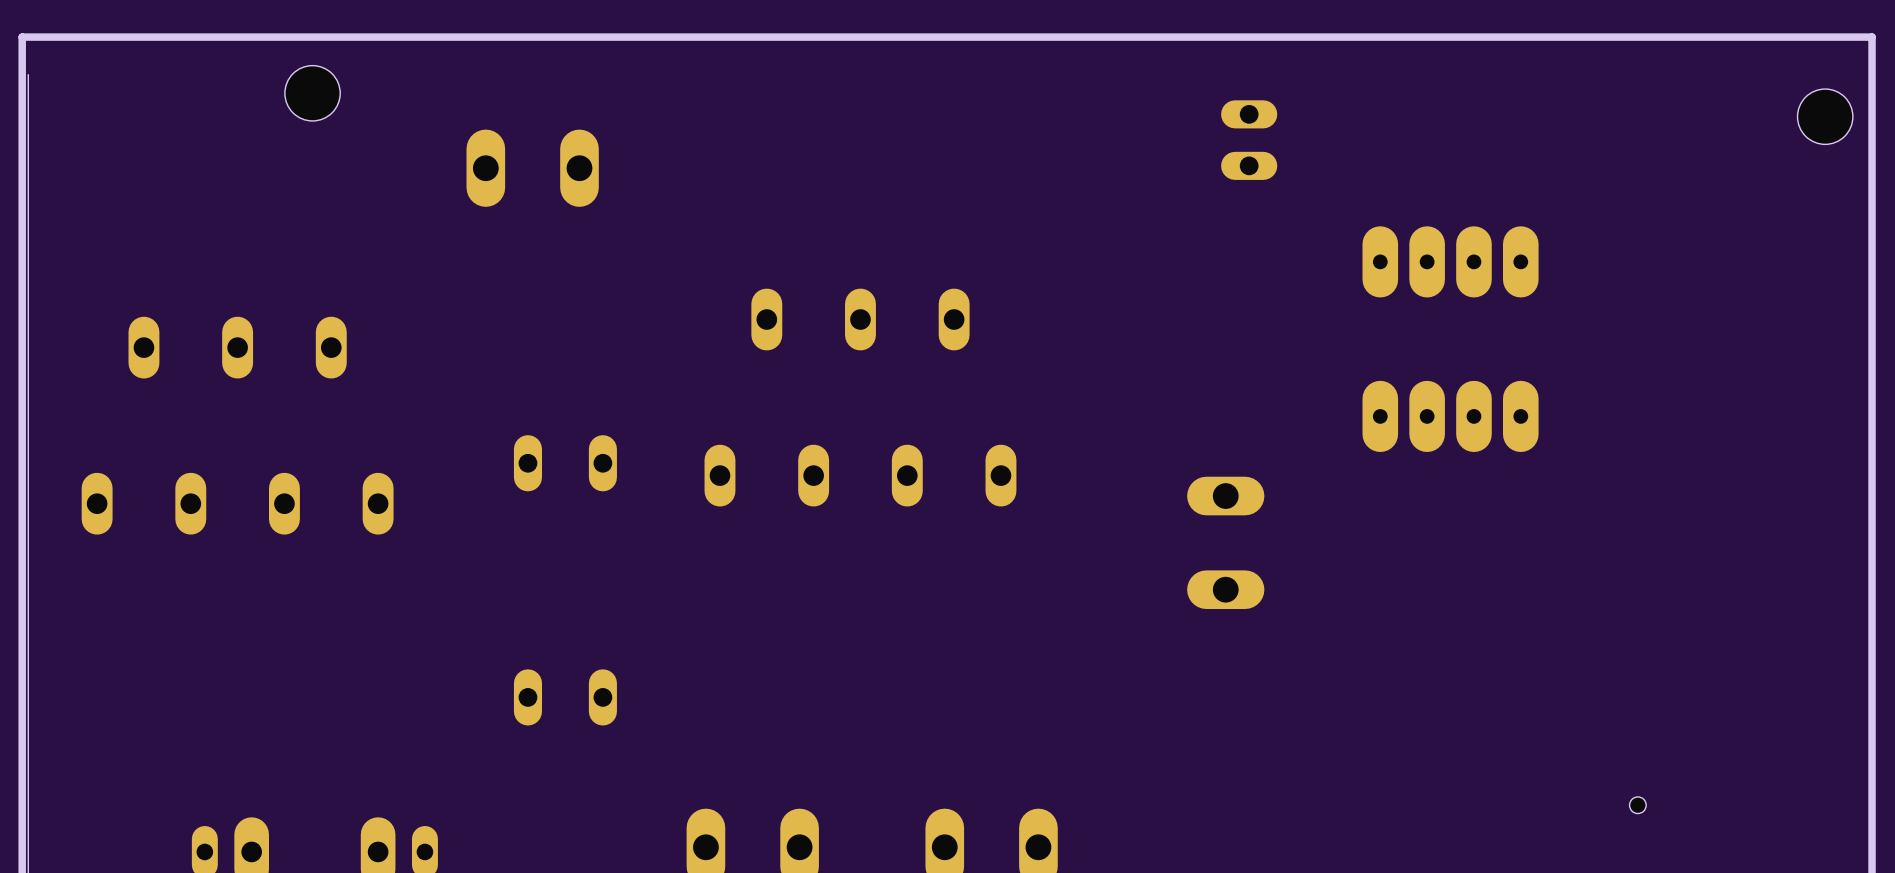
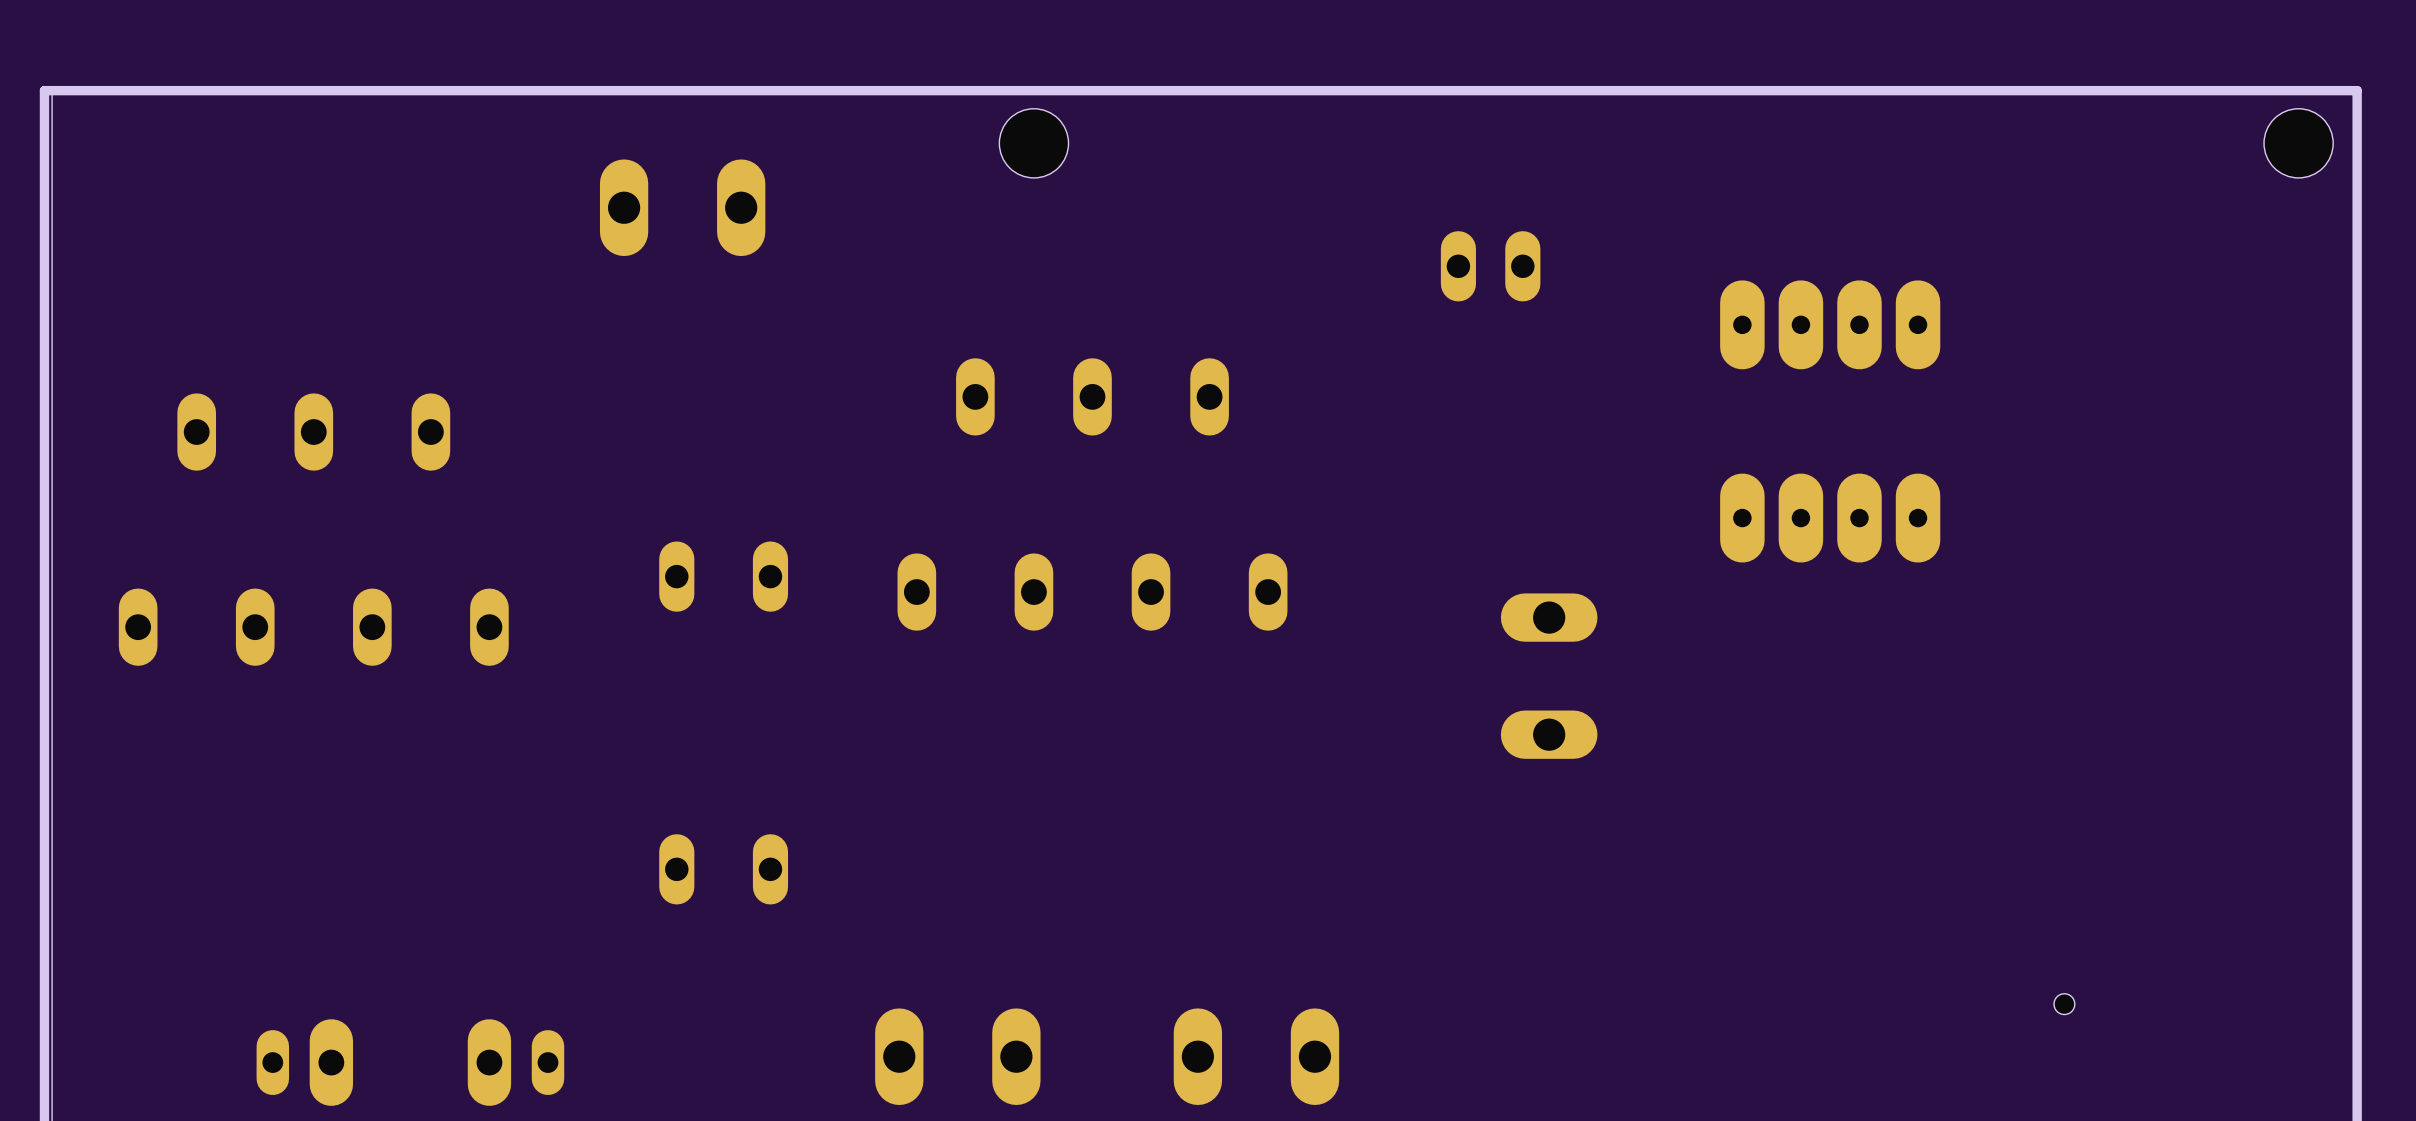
board edge: (1872, 74) (1872, 37) (22, 37) (22, 74) -> (2357, 90) (44, 90)
hole: (312, 93) -> none
hole: none -> (1033, 143)
part rotation: 0° (1249, 140) -> 90° clockwise (1490, 266)
part position: (1249, 140) -> (1490, 266)

